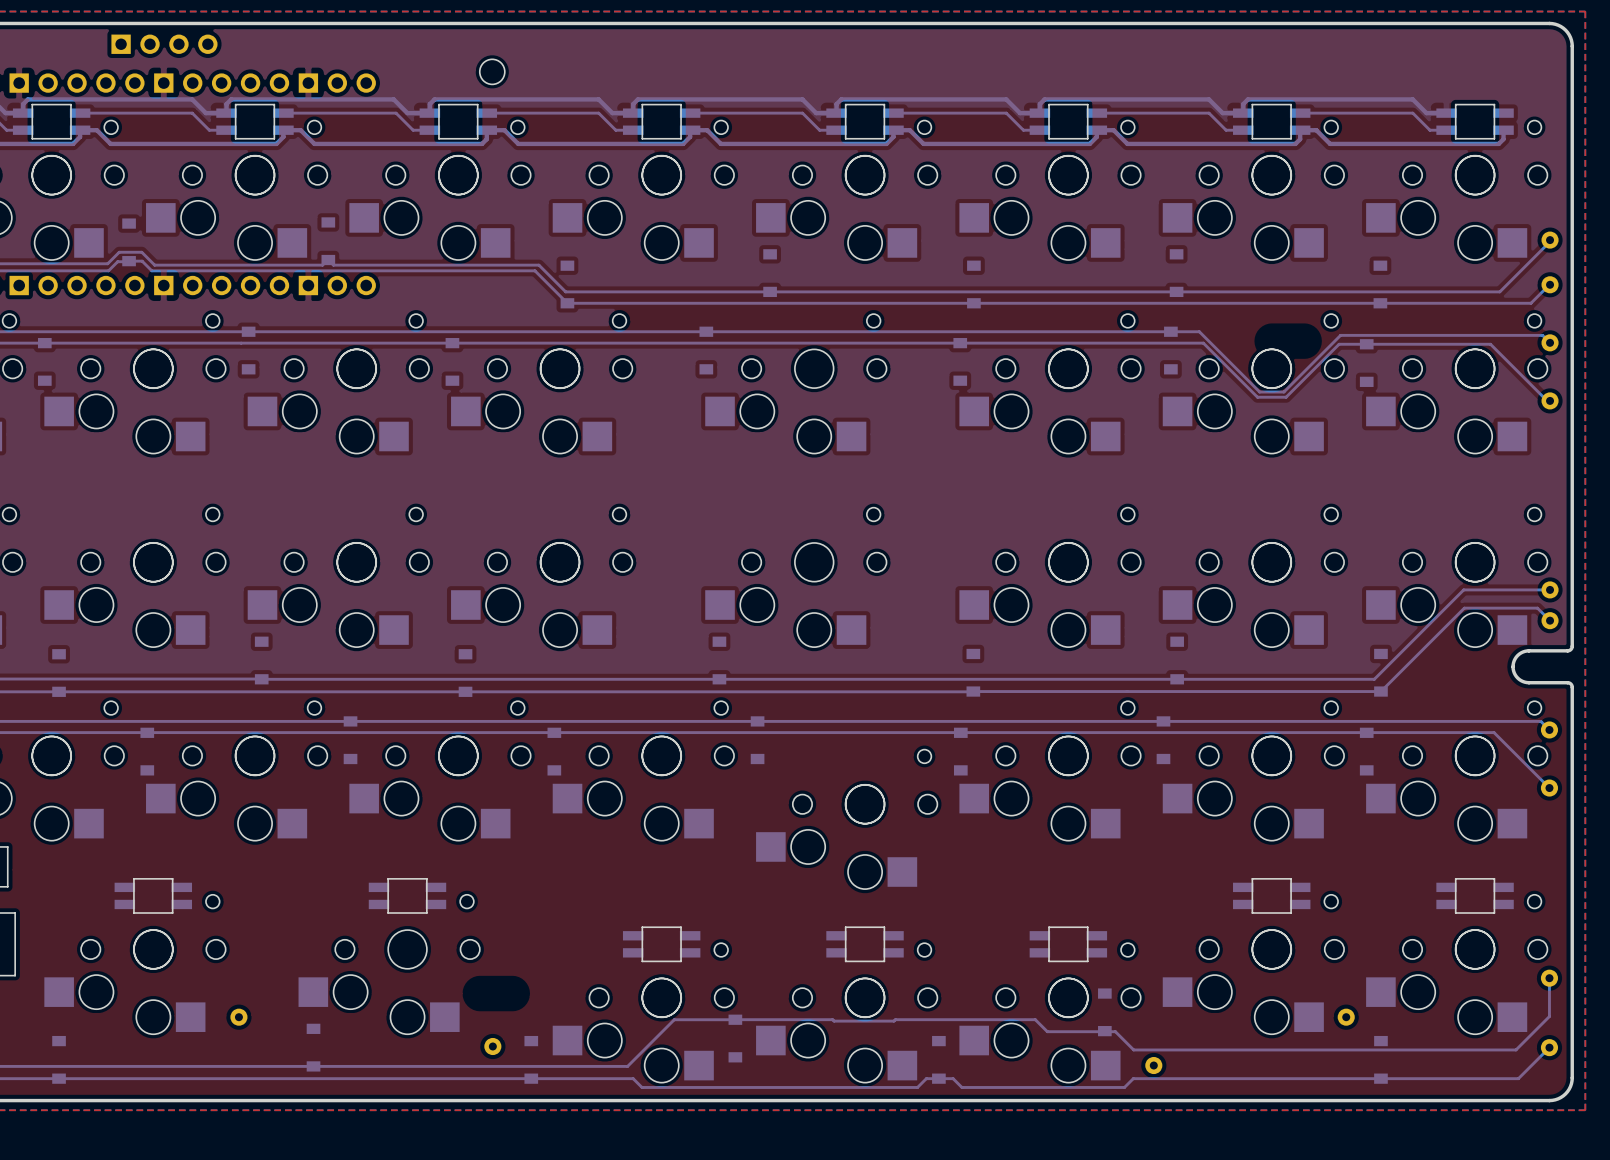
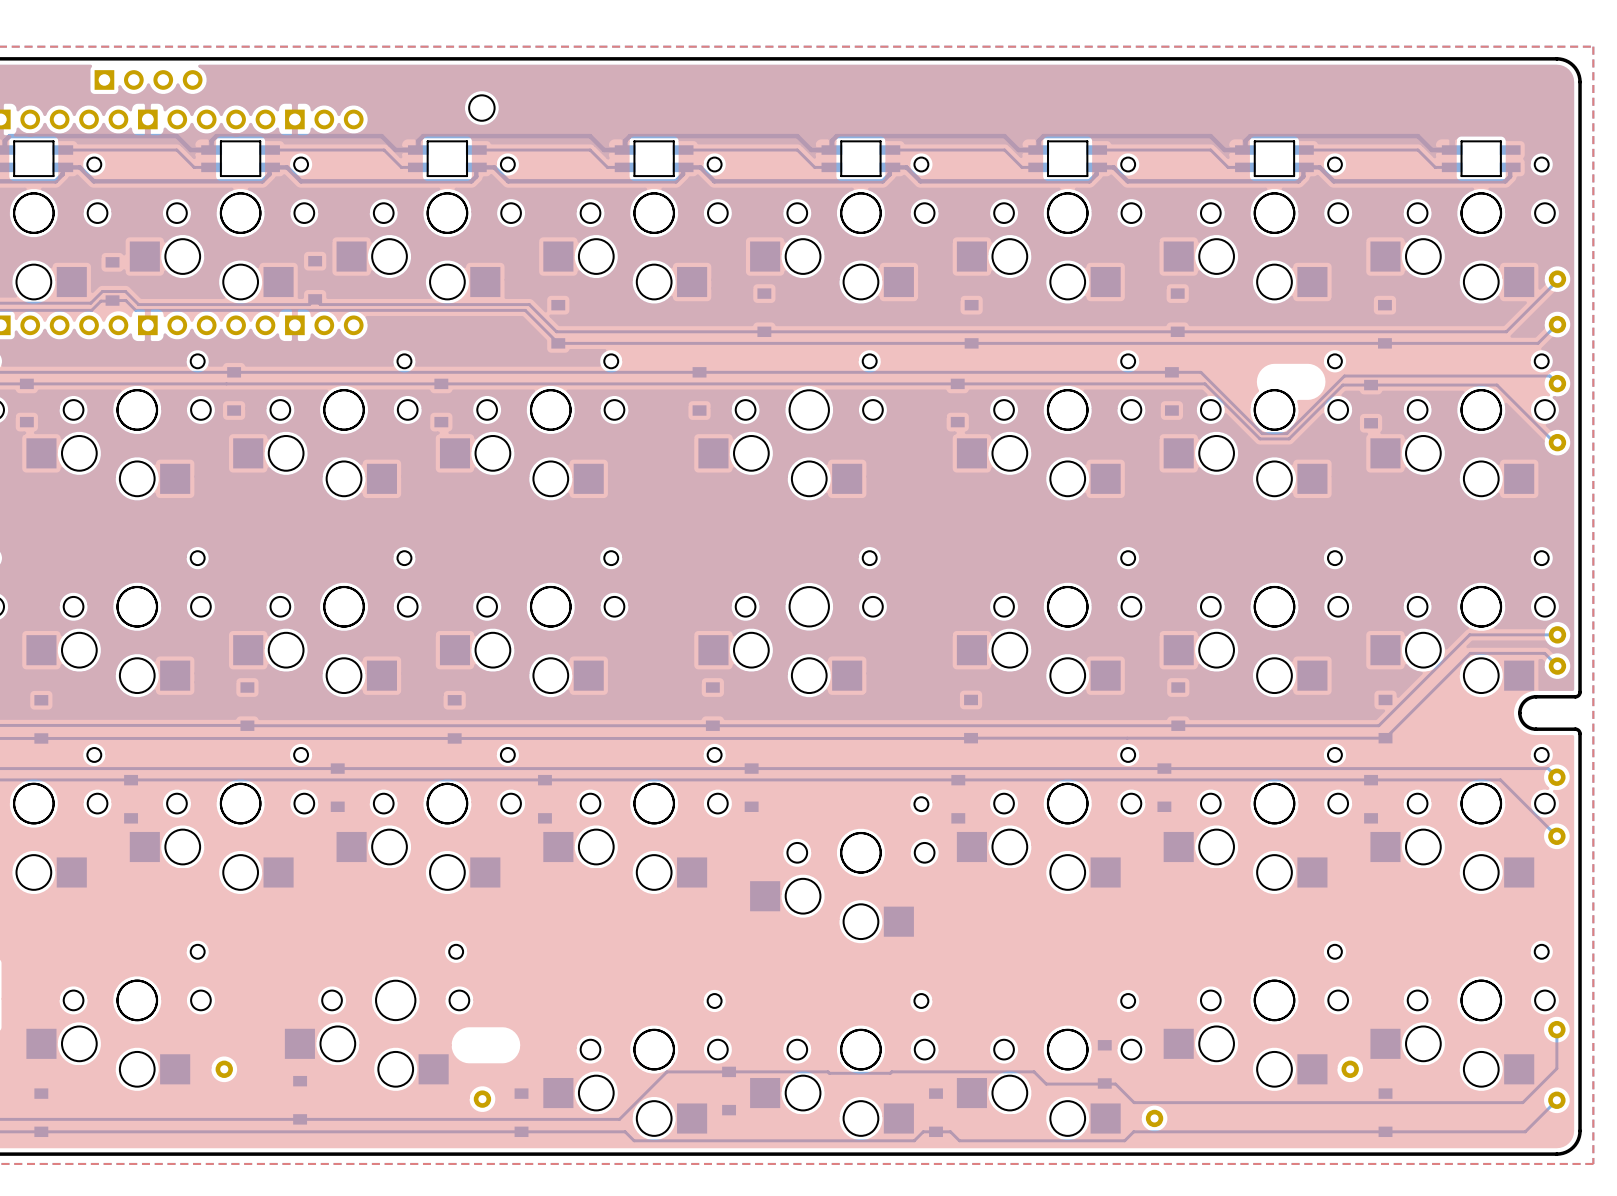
part: (153, 895) -> none
part: (407, 895) -> none
part: (1271, 895) -> none
part: (1475, 895) -> none
part: (661, 944) -> none
part: (865, 944) -> none
part: (1068, 944) -> none

